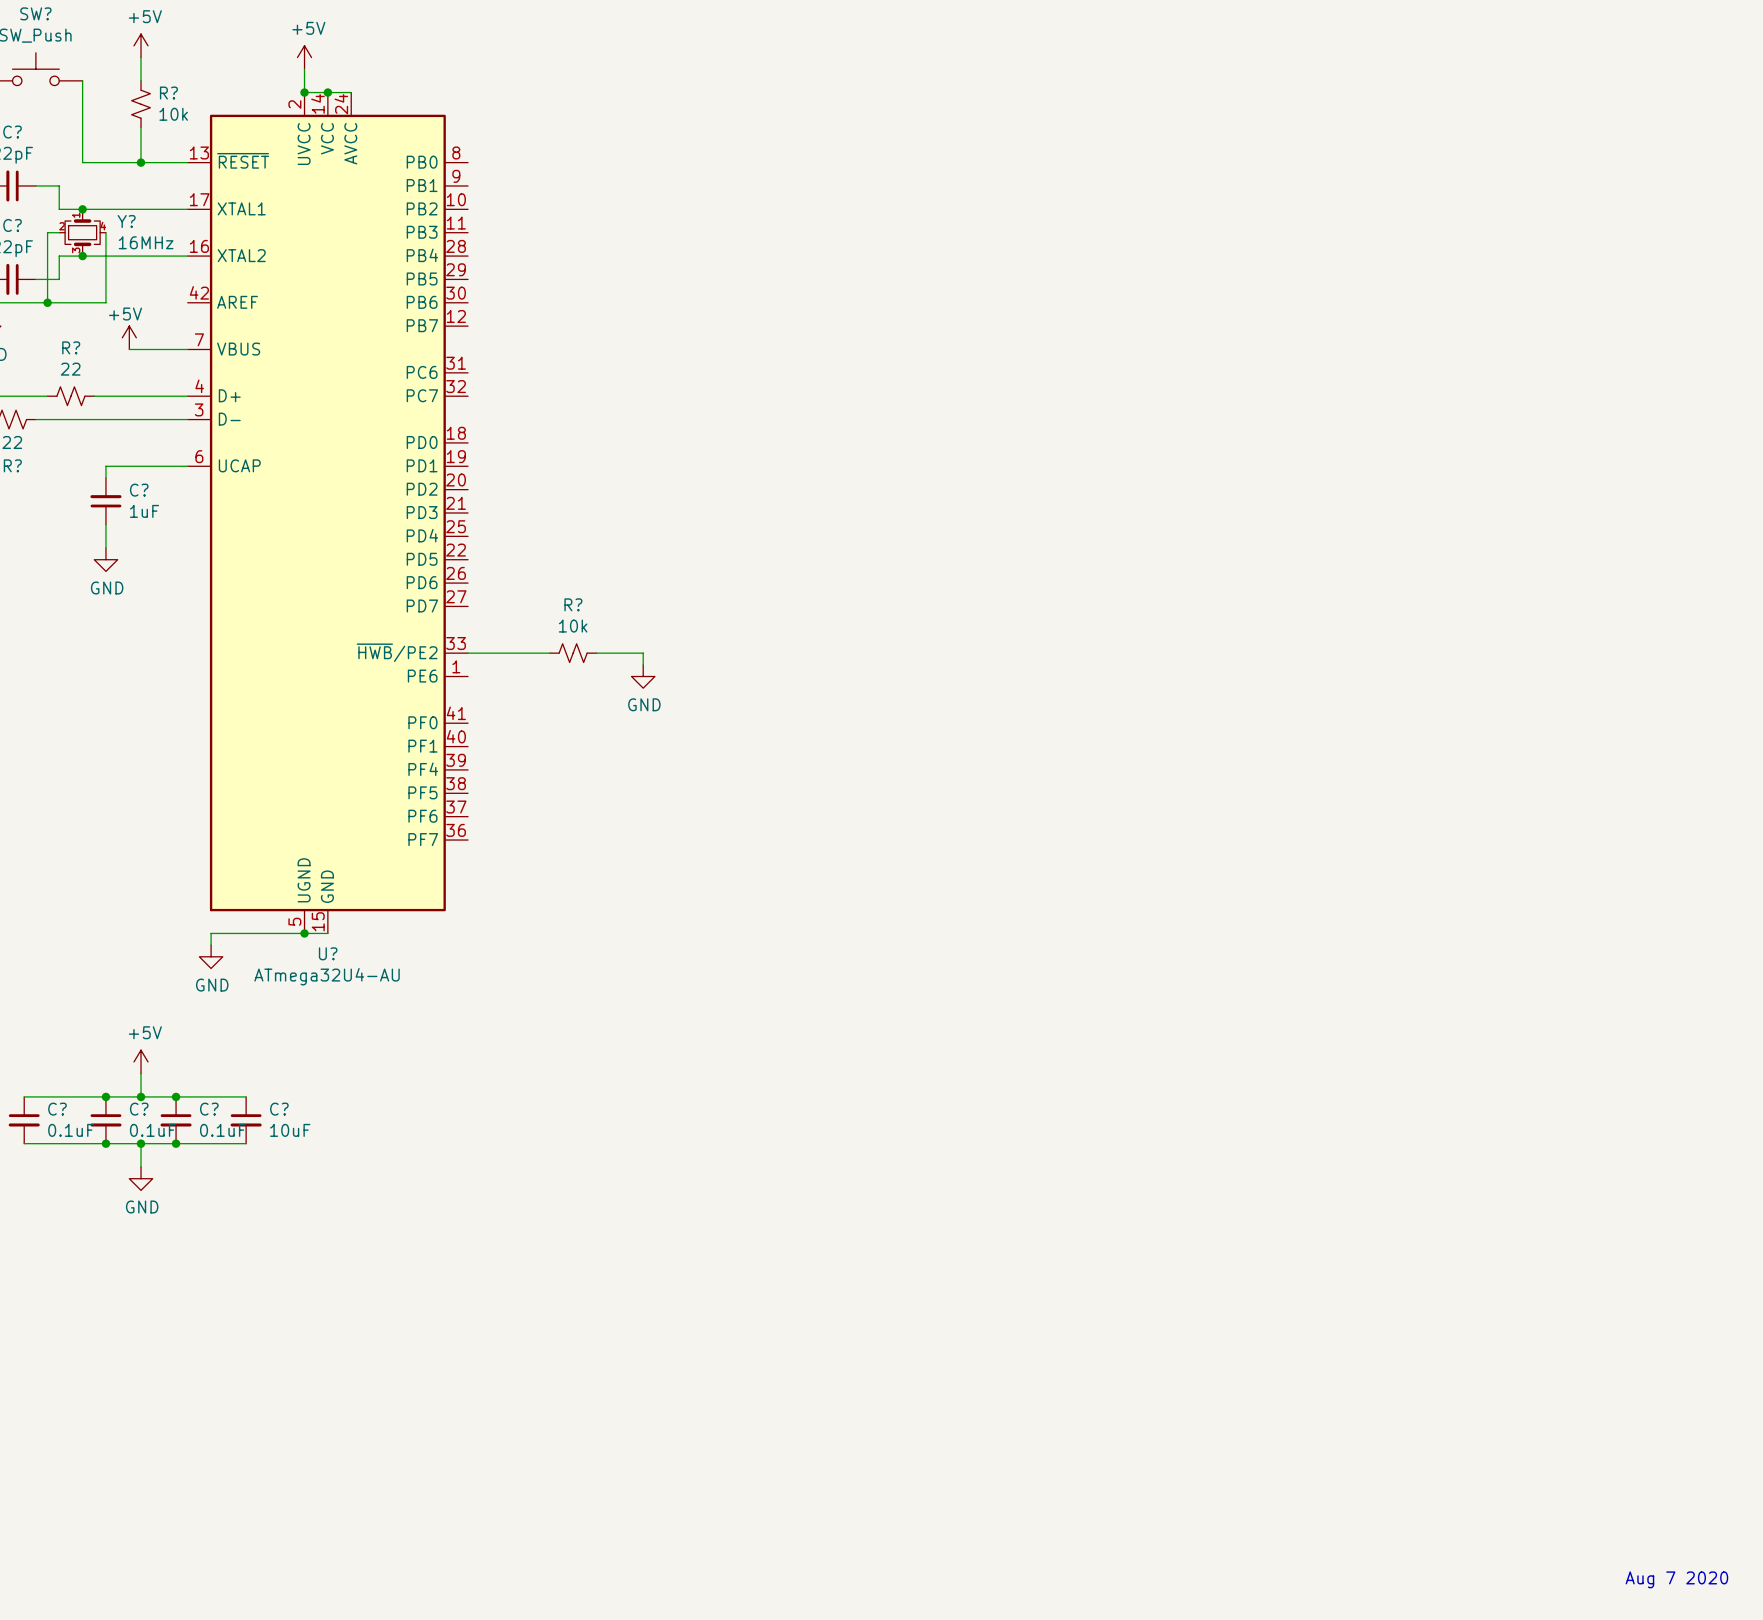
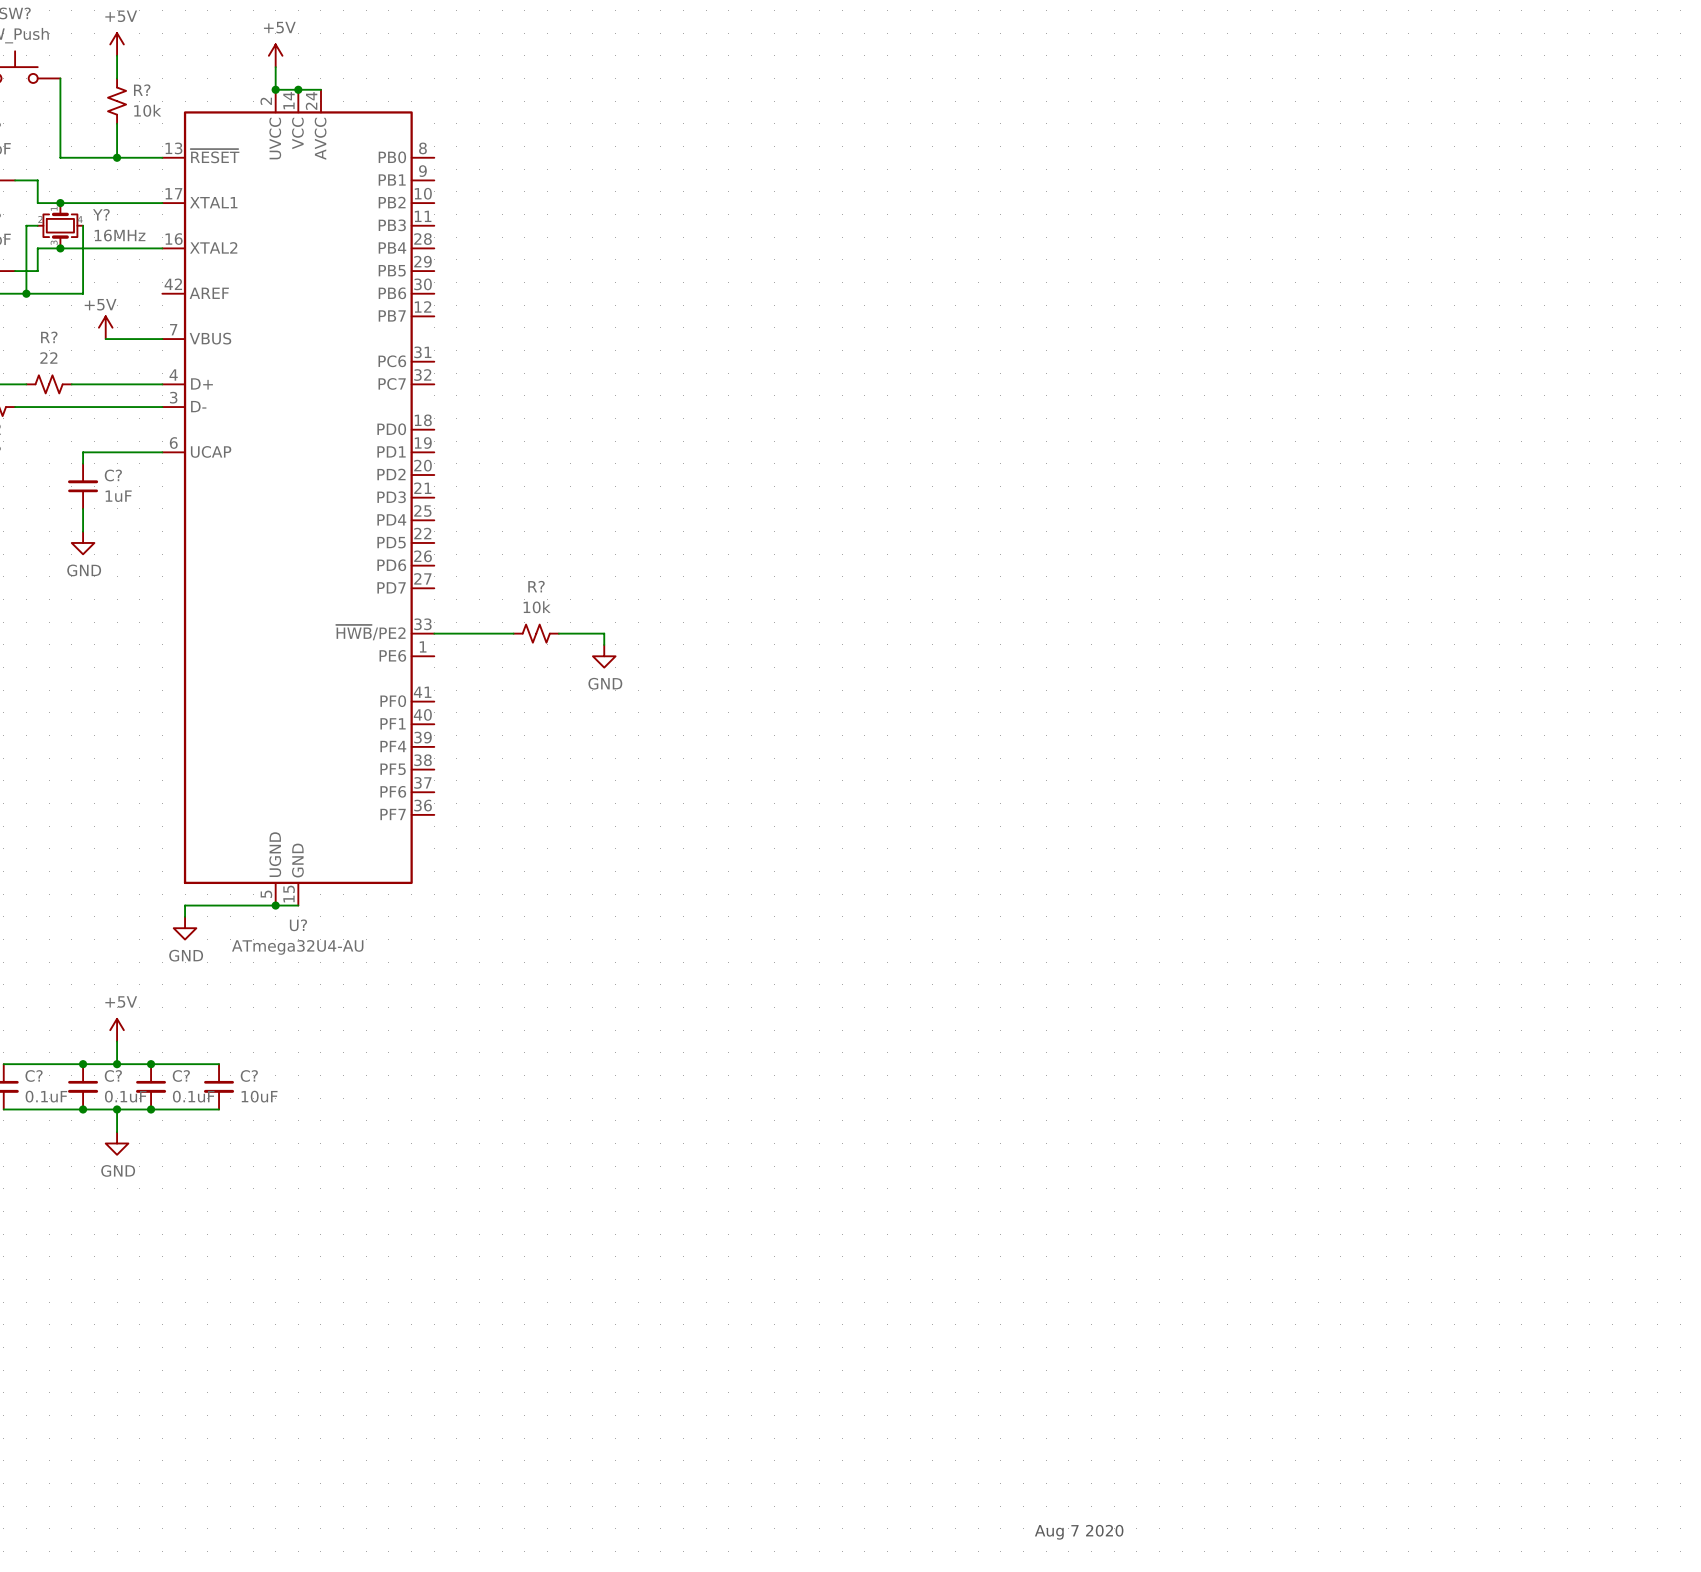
text: none -> Aug 7 2020 (1079, 1532)
text: Aug 7 2020 (1676, 1579) -> none

